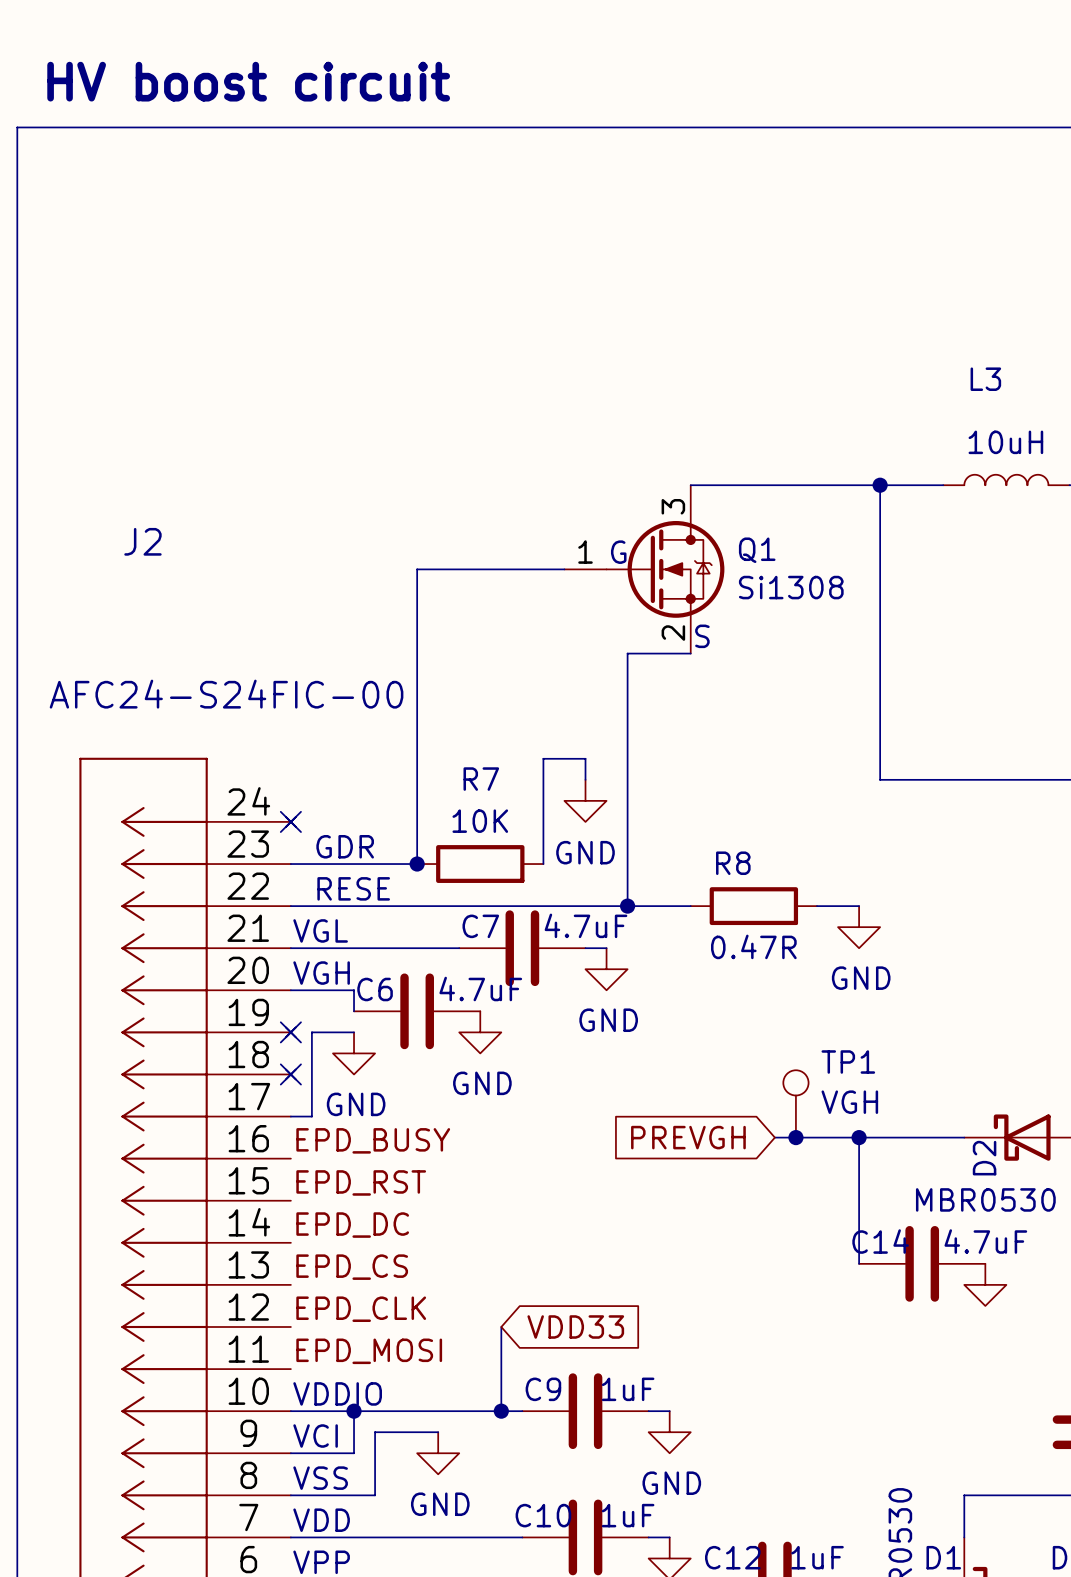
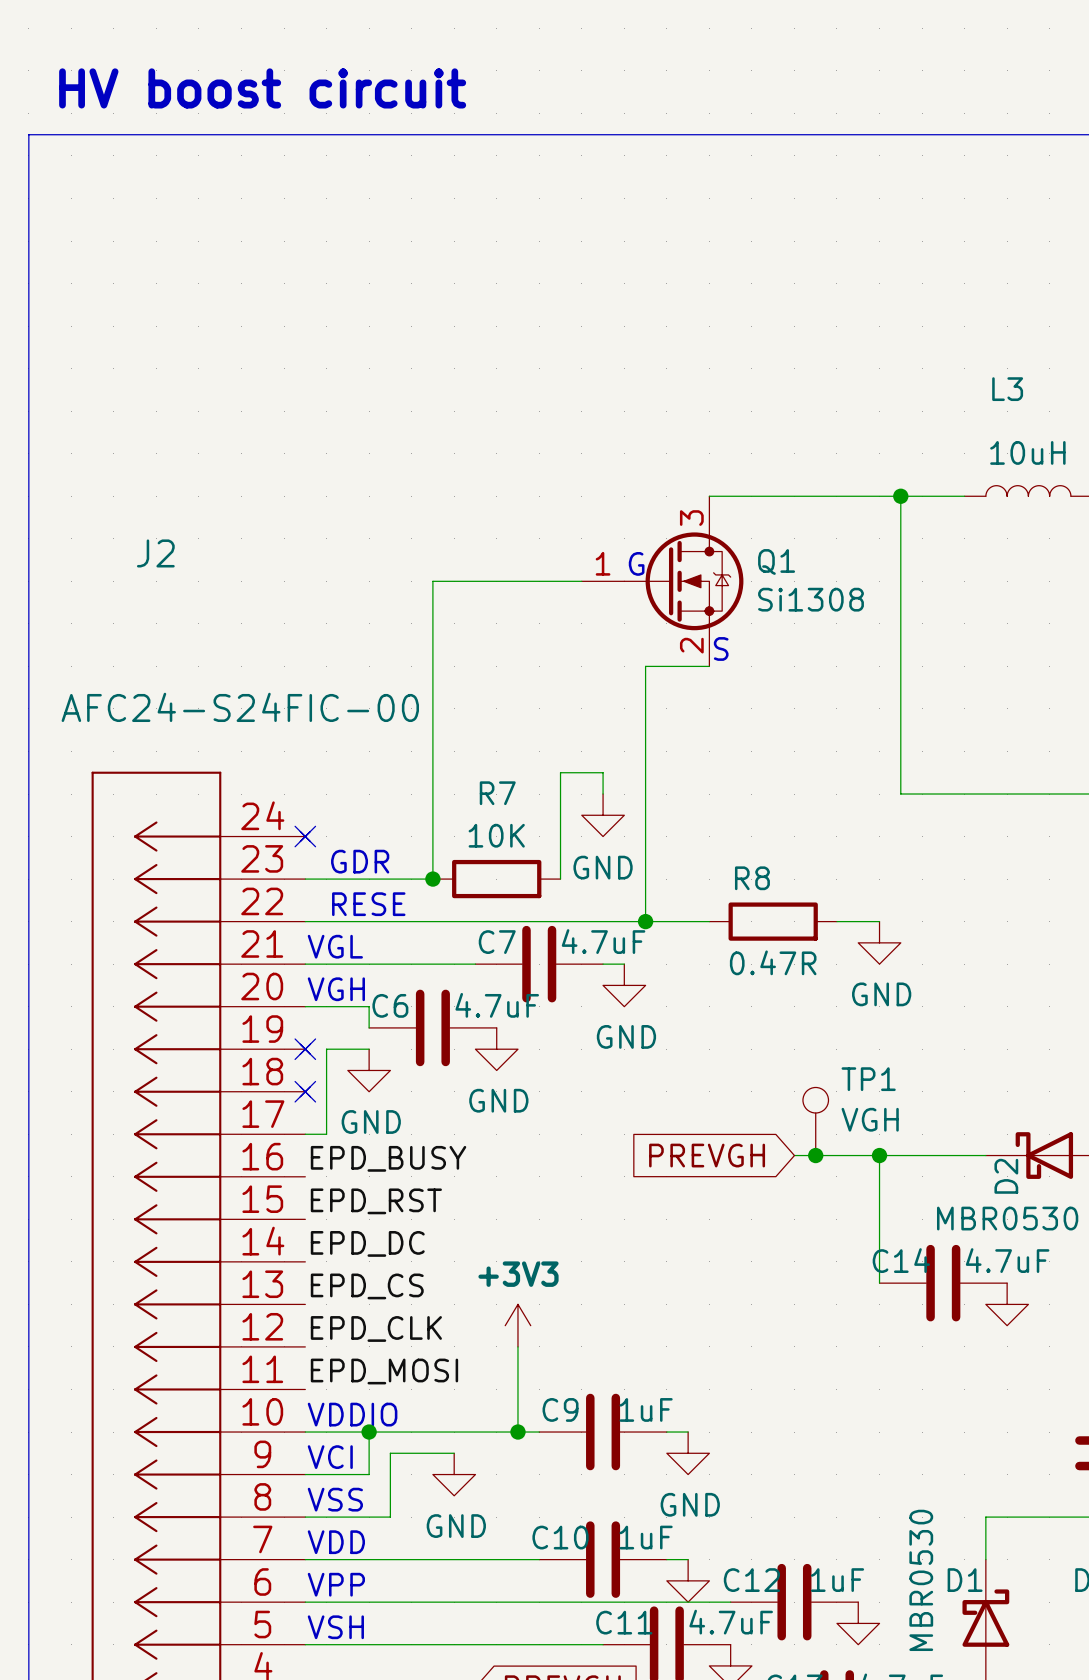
power symbol: none -> +3V3 (517, 1325)
global label: VDD33 (575, 1326) -> none

